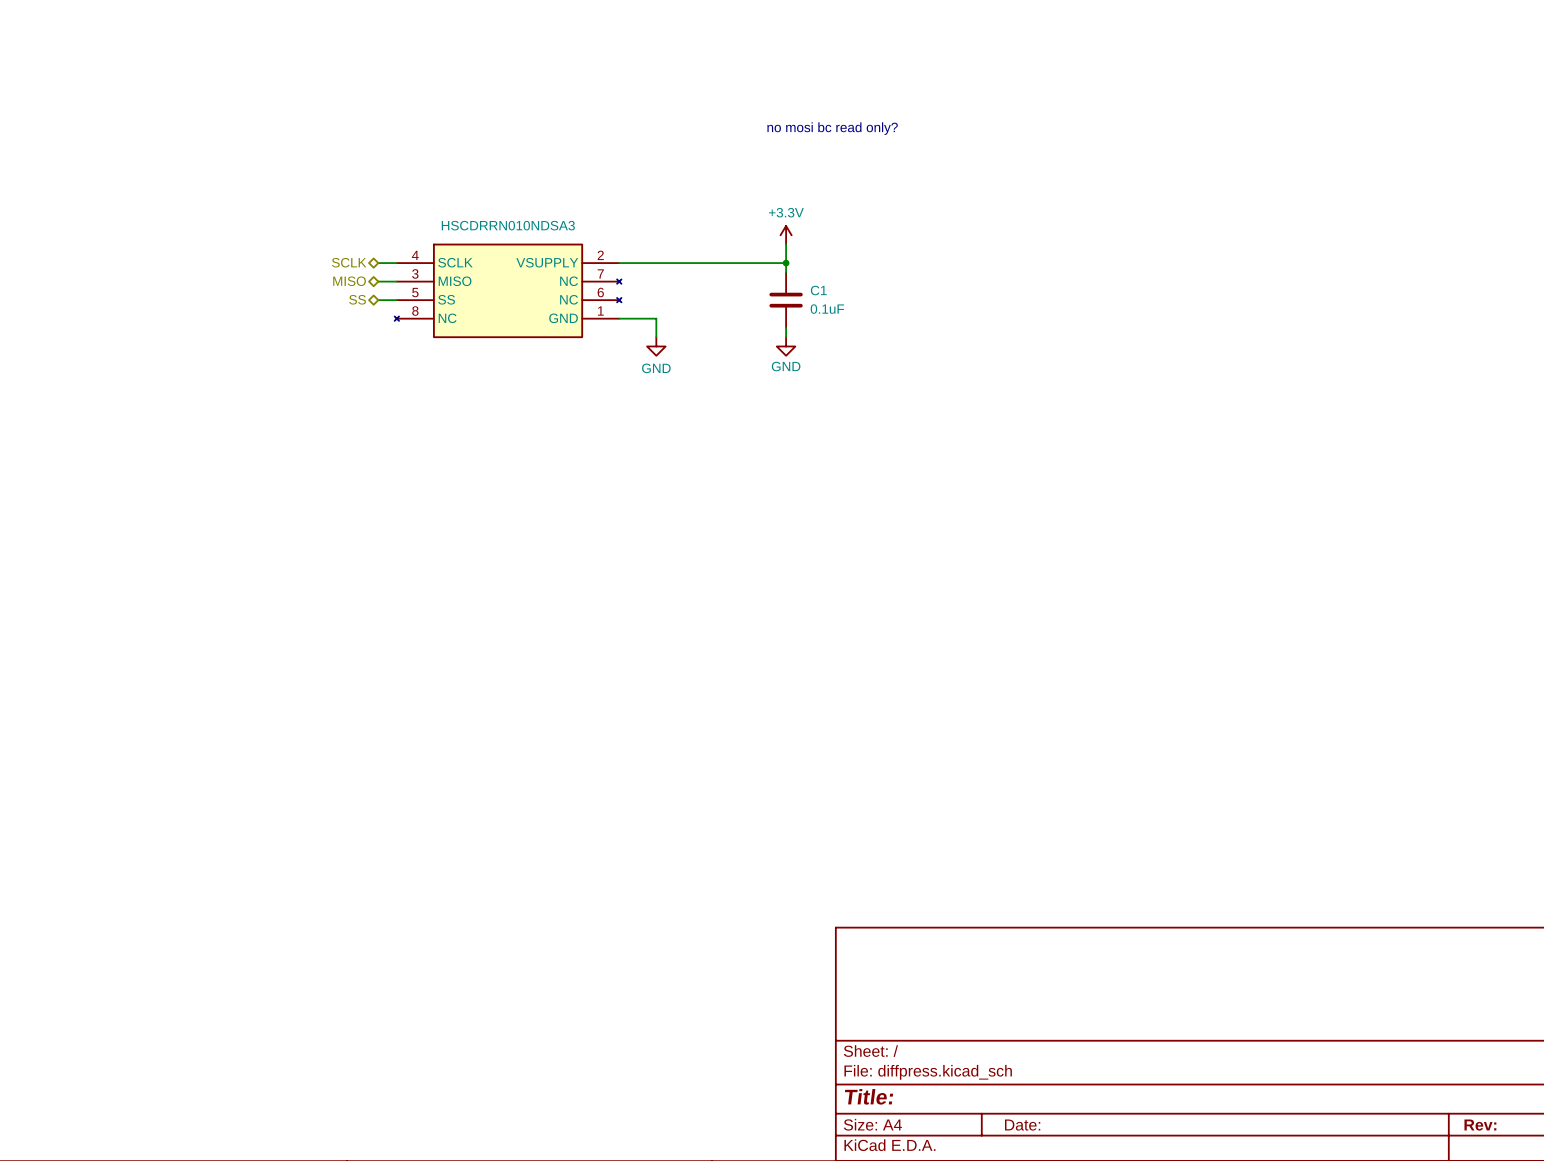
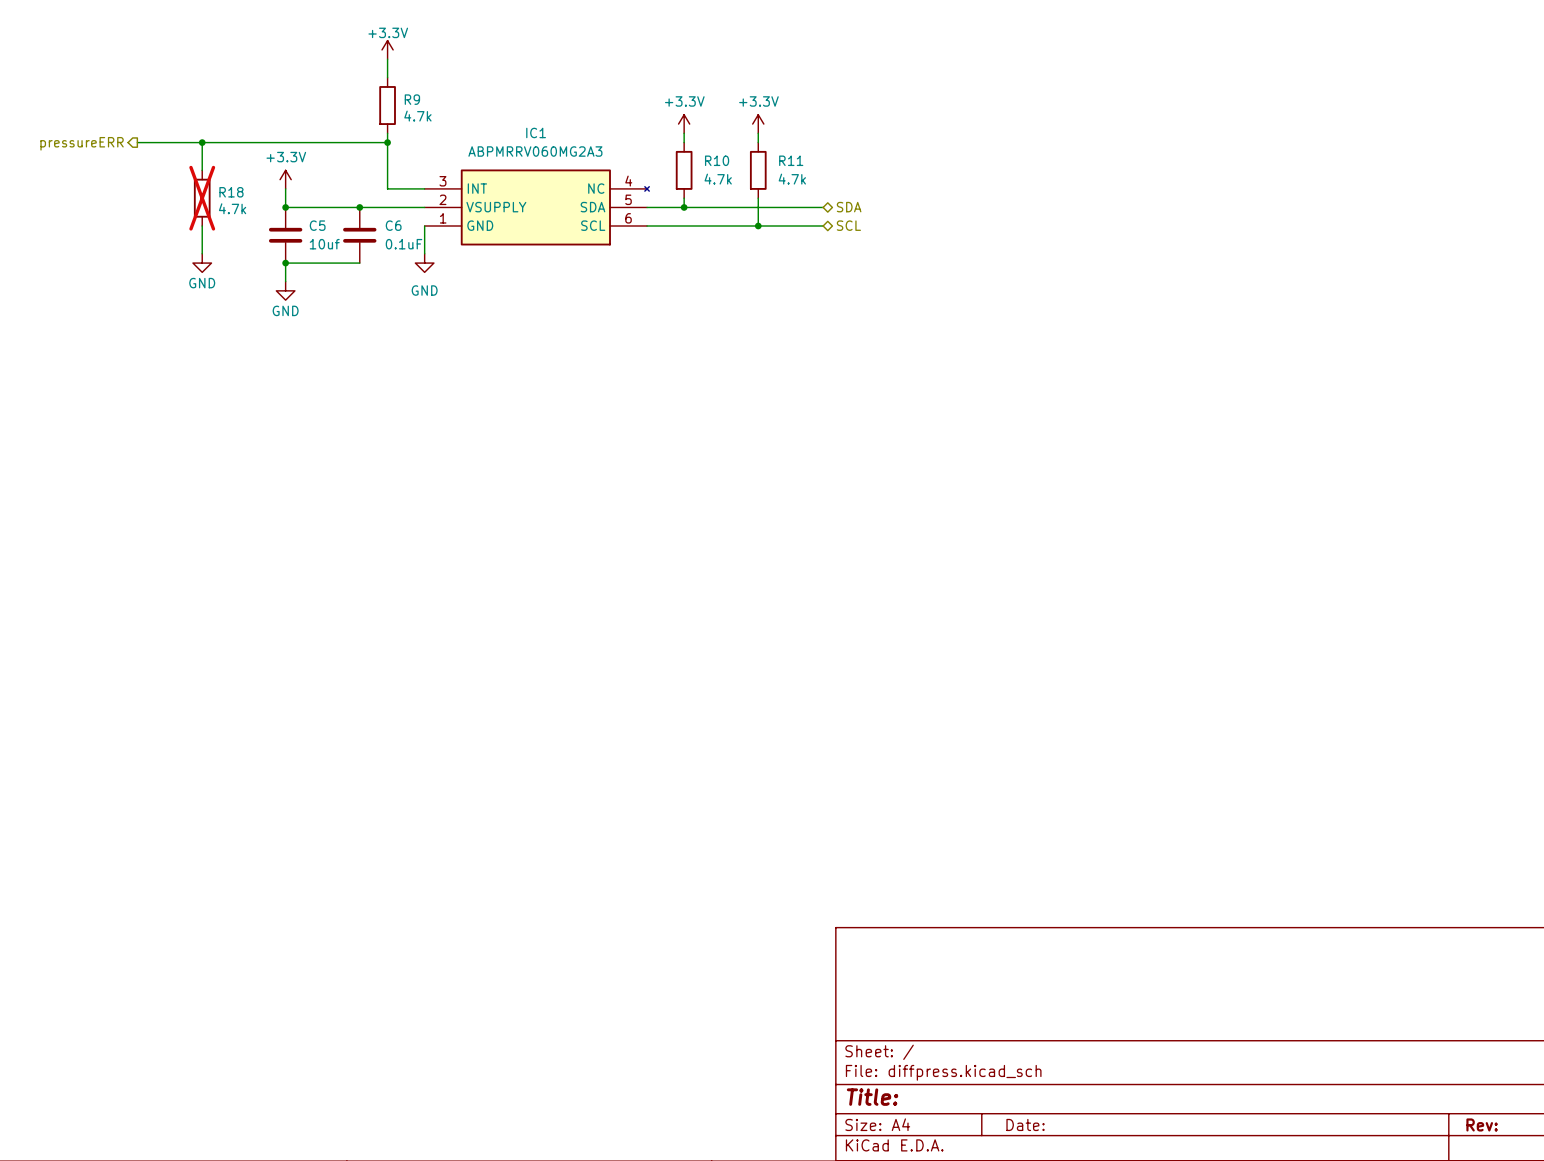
power symbol: none -> +3.3V (387, 49)
wire: none -> (387, 59) (387, 77)
R9: none -> 4.7k (387, 105)
power symbol: none -> +3.3V (684, 124)
power symbol: none -> +3.3V (758, 124)
text: no mosi bc read only? (832, 128) -> none
wire: none -> (387, 133) (387, 188) (424, 188)
wire: none -> (684, 133) (684, 142)
wire: none -> (758, 133) (758, 142)
wire: none -> (137, 142) (387, 142)
wire: none -> (202, 142) (202, 170)
junction: none -> (202, 142)
junction: none -> (387, 142)
hierarchical label: none -> pressureERR (82, 143)
R10: none -> 4.7k (684, 170)
R11: none -> 4.7k (758, 170)
power symbol: none -> +3.3V (285, 179)
wire: none -> (285, 188) (285, 207) (424, 207)
R18: none -> 4.7k (202, 198)
junction: none -> (285, 207)
junction: none -> (359, 207)
IC1: none -> ABPMRRV060MG2A3 (536, 207)
wire: none -> (647, 207) (823, 207)
junction: none -> (684, 207)
hierarchical label: none -> SDA (849, 207)
hierarchical label: none -> SCL (848, 225)
wire: none -> (202, 226) (202, 253)
wire: none -> (424, 226) (424, 253)
wire: none -> (647, 226) (823, 226)
junction: none -> (758, 226)
C5: none -> 10uf (285, 235)
C6: none -> 0.1uF (359, 235)
power symbol: +3.3V (786, 235) -> none
wire: (786, 244) (786, 272) -> (758, 198) (758, 226)
hierarchical label: SCLK (349, 262) -> none
power symbol: none -> GND (202, 263)
junction: none -> (285, 263)
wire: none -> (359, 263) (285, 263) (285, 281)
wire: (378, 263) (396, 263) -> none
power symbol: none -> GND (424, 263)
wire: (619, 263) (786, 263) -> none
junction: (786, 263) -> none
hierarchical label: MISO (349, 281) -> none
wire: (378, 281) (396, 281) -> none
power symbol: none -> GND (285, 290)
part: HSCDRRN010NDSA3 (508, 290) -> none
hierarchical label: SS (357, 299) -> none
wire: (378, 300) (396, 300) -> none
C1: 0.1uF (786, 300) -> none
wire: (619, 318) (656, 318) (656, 337) -> none
wire: (786, 327) (786, 337) -> (684, 198) (684, 207)
power symbol: GND (656, 346) -> none
power symbol: GND (786, 346) -> none

